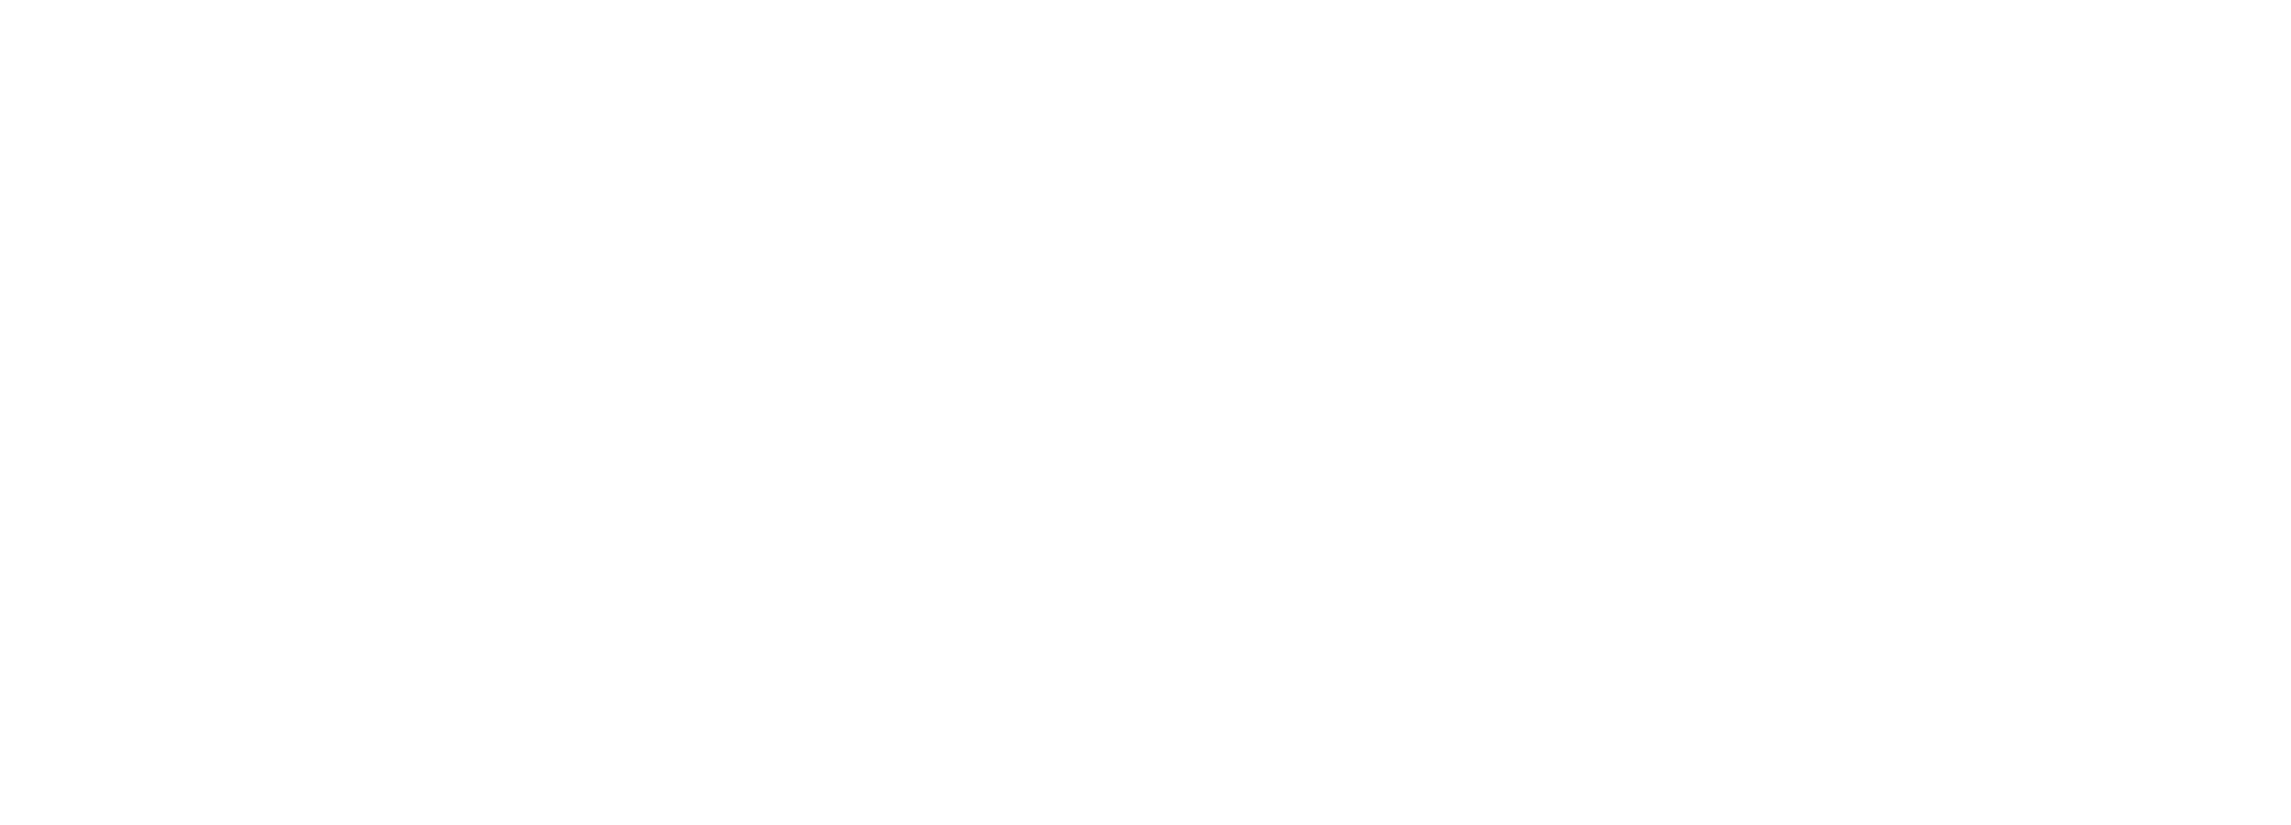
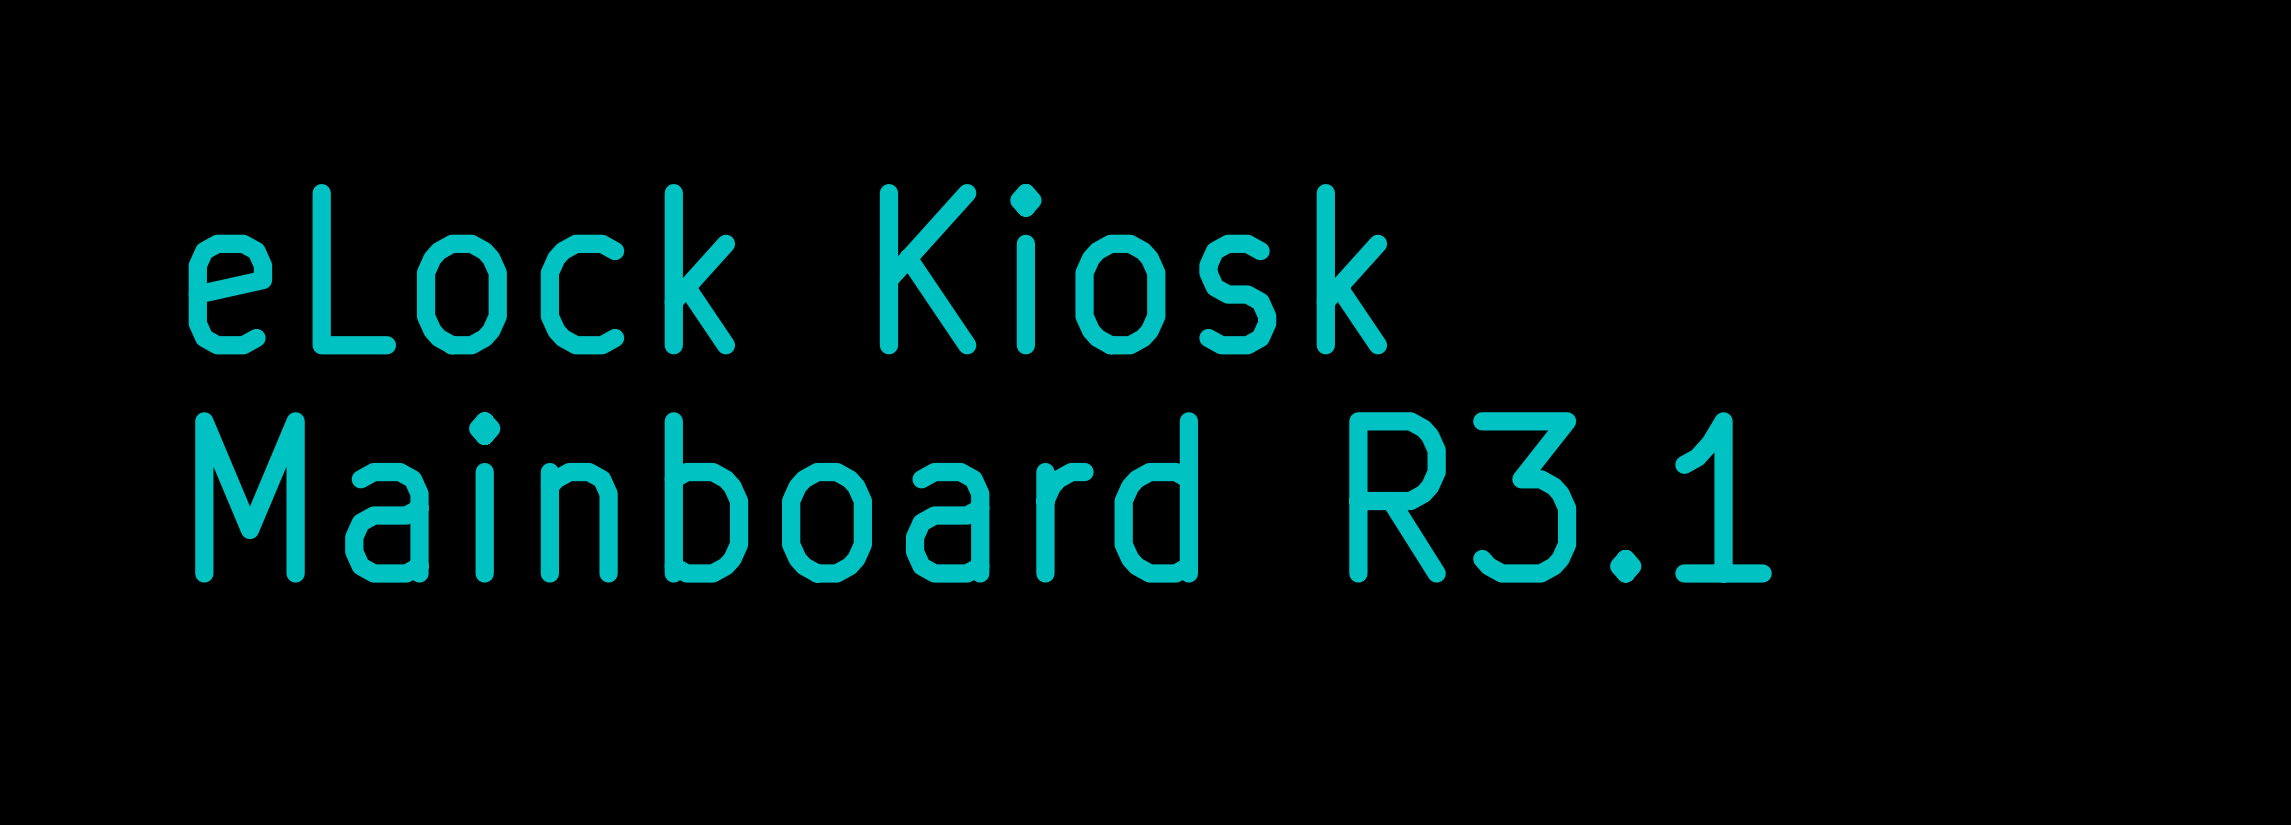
text: none -> eLock Kiosk (787, 269)
text: none -> Mainboard R3.1 (983, 497)

